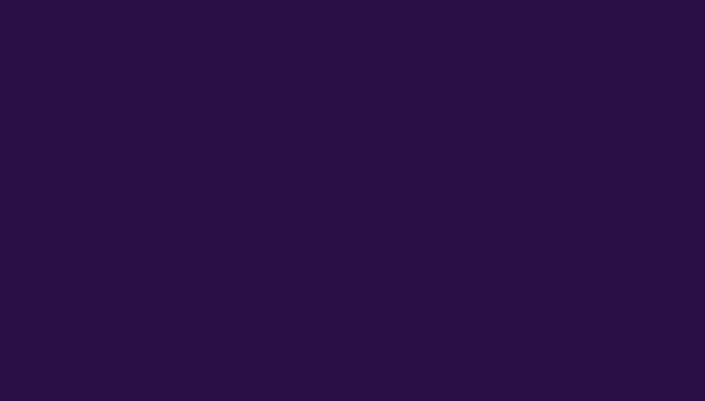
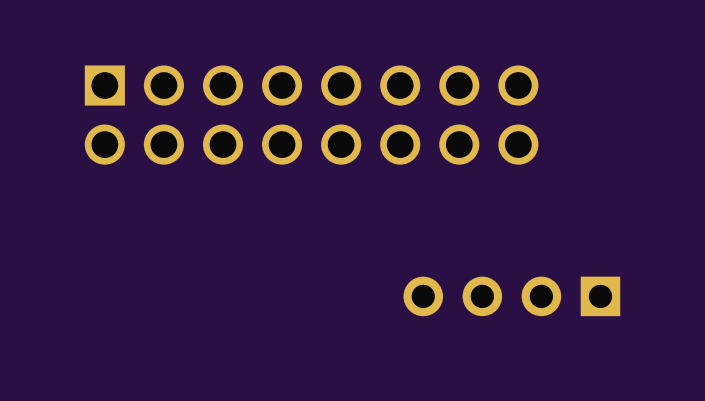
part: none -> (311, 115)
part: none -> (511, 296)

